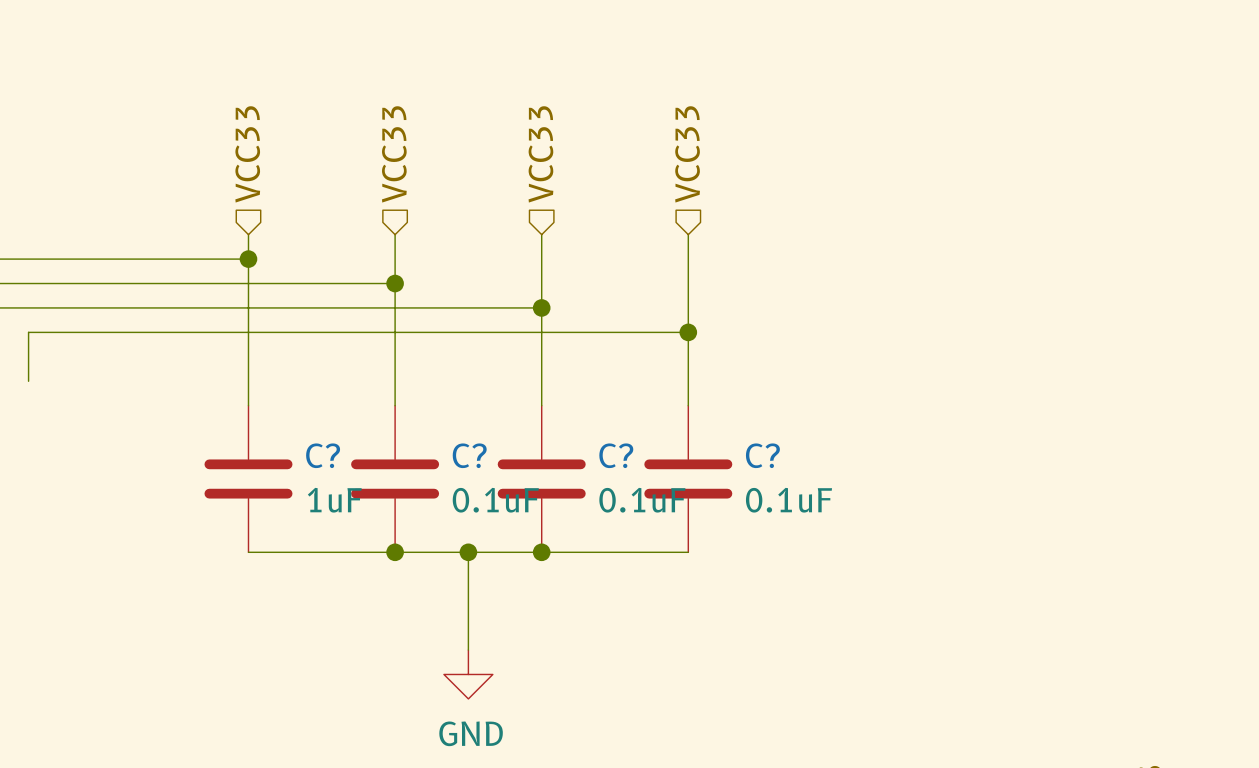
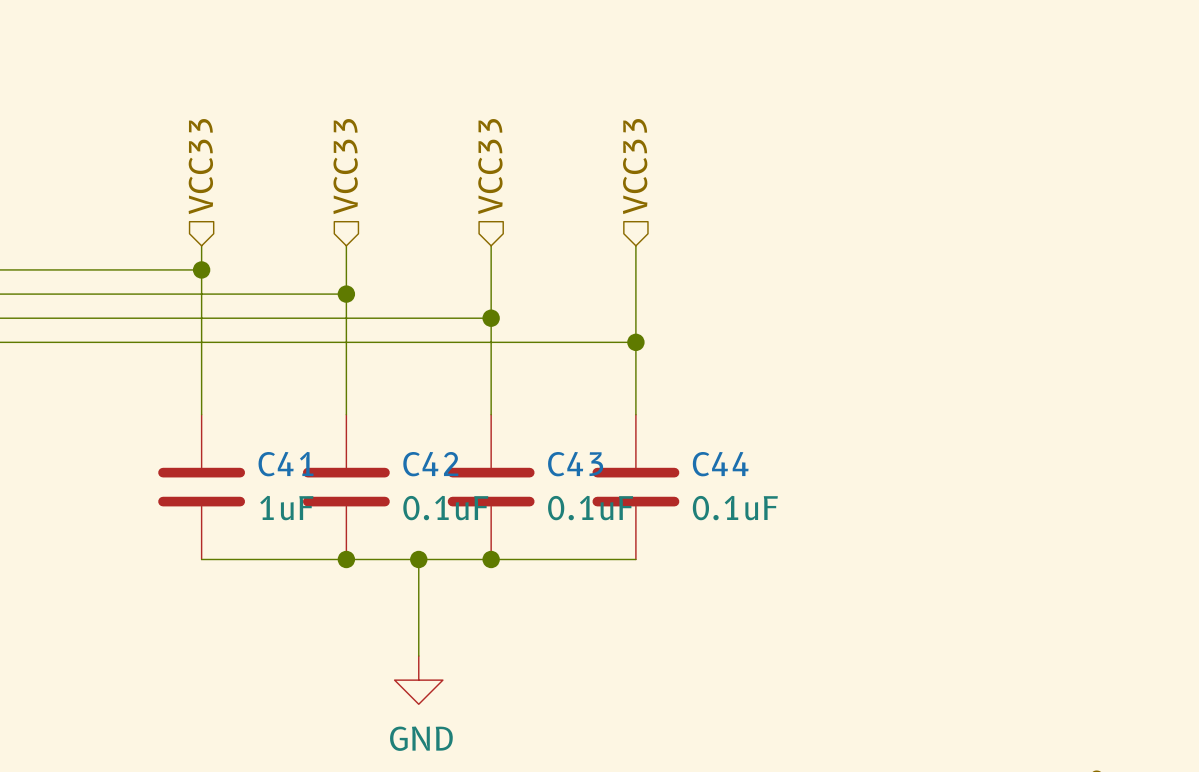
C? name: C? (323, 455) -> C41 (285, 464)
C? name: C? (469, 455) -> C42 (430, 464)
C? name: C? (616, 455) -> C43 (575, 464)
C? name: C? (762, 455) -> C44 (720, 464)

